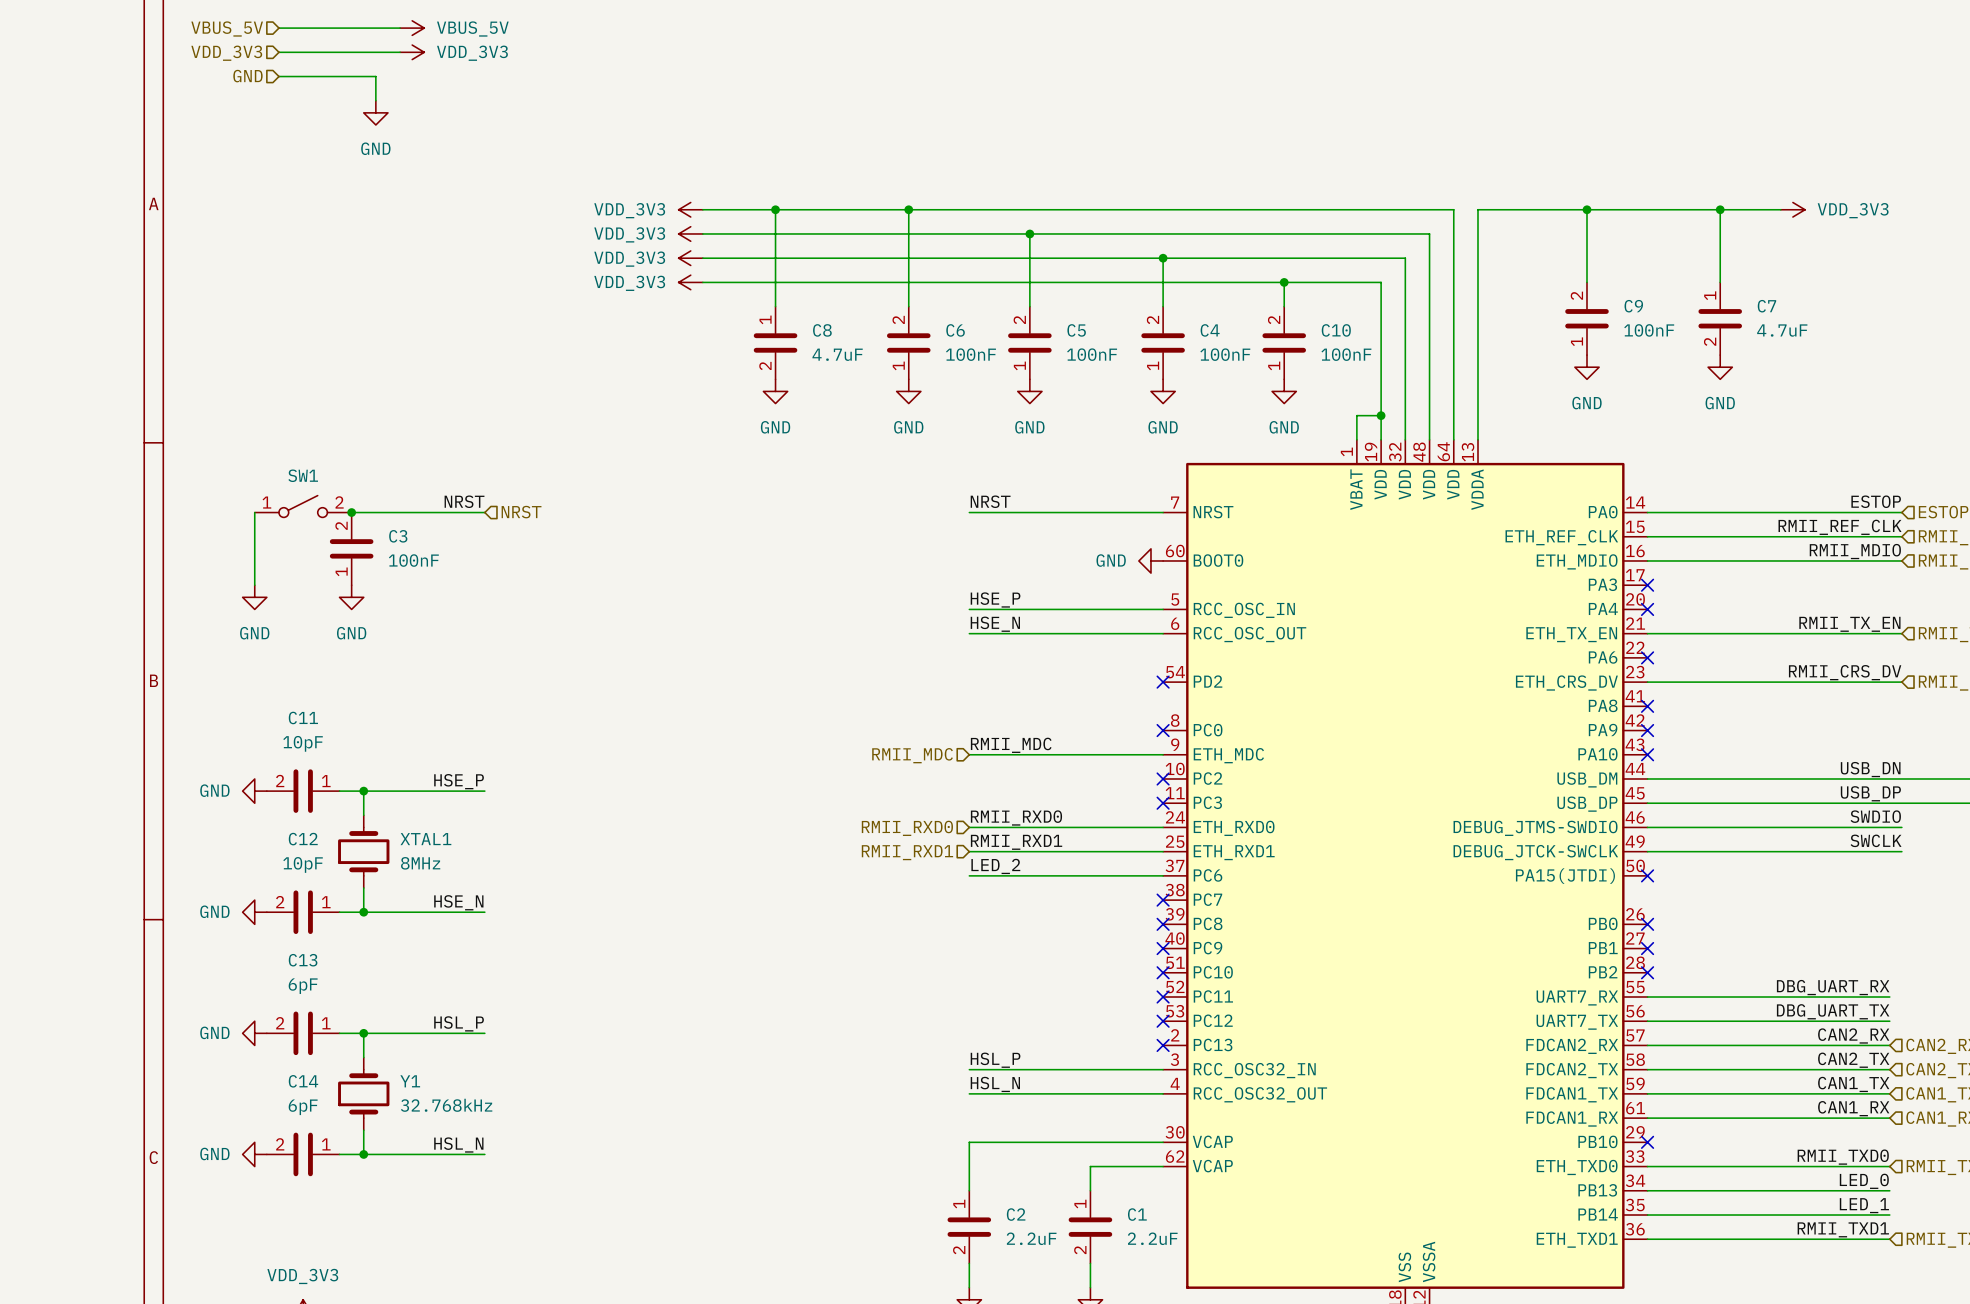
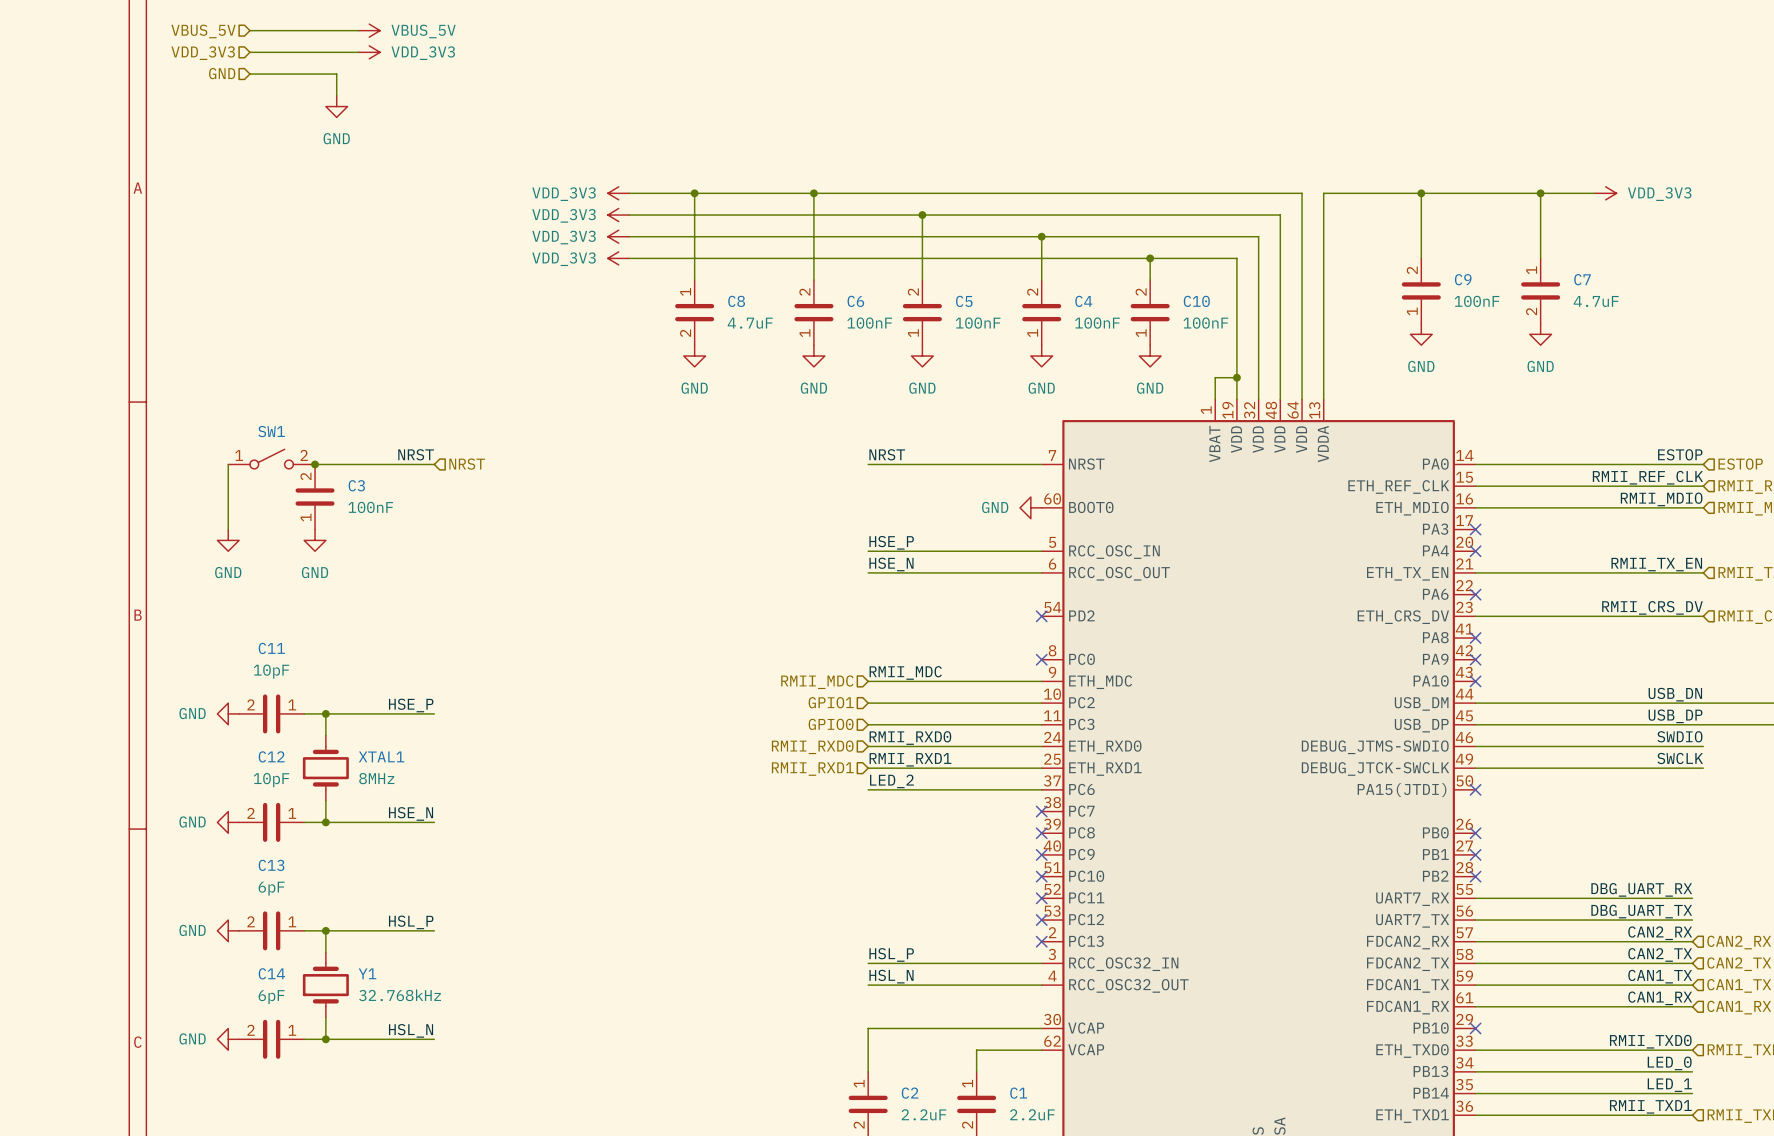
hierarchical label: none -> GPIO1 (831, 702)
wire: none -> (868, 703) (1041, 703)
no-connect mark: (1163, 778) -> none
hierarchical label: none -> GPIO0 (831, 724)
wire: none -> (868, 724) (1041, 724)
no-connect mark: (1163, 803) -> none

